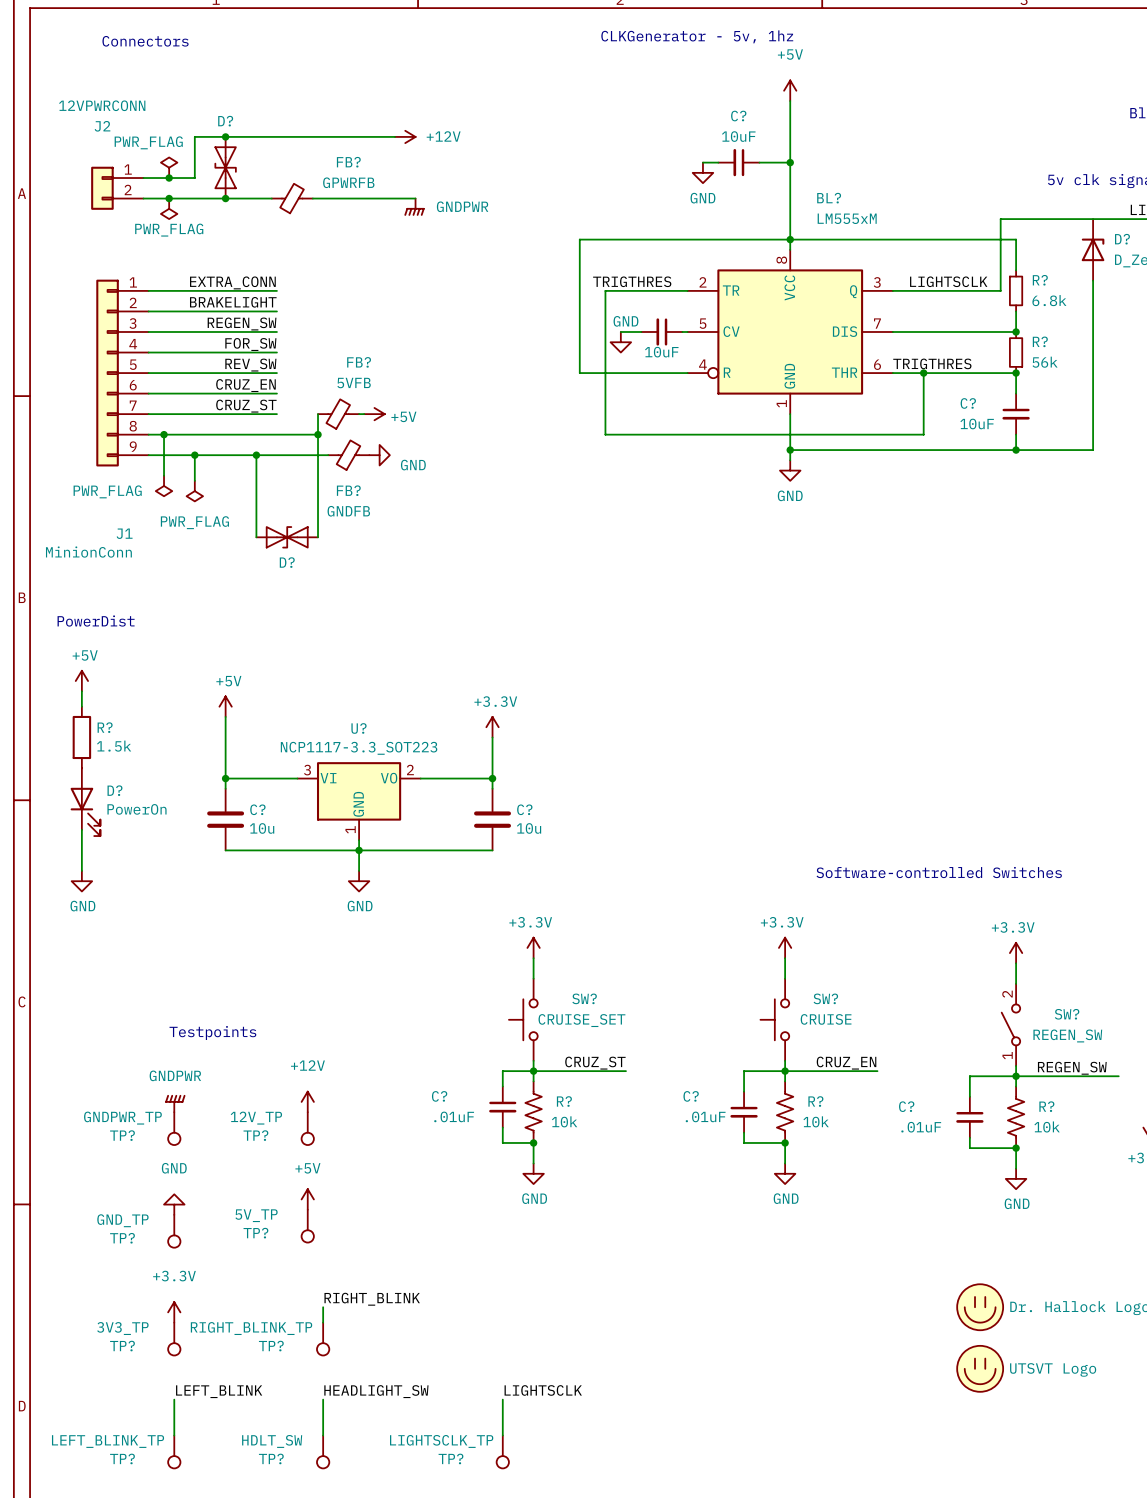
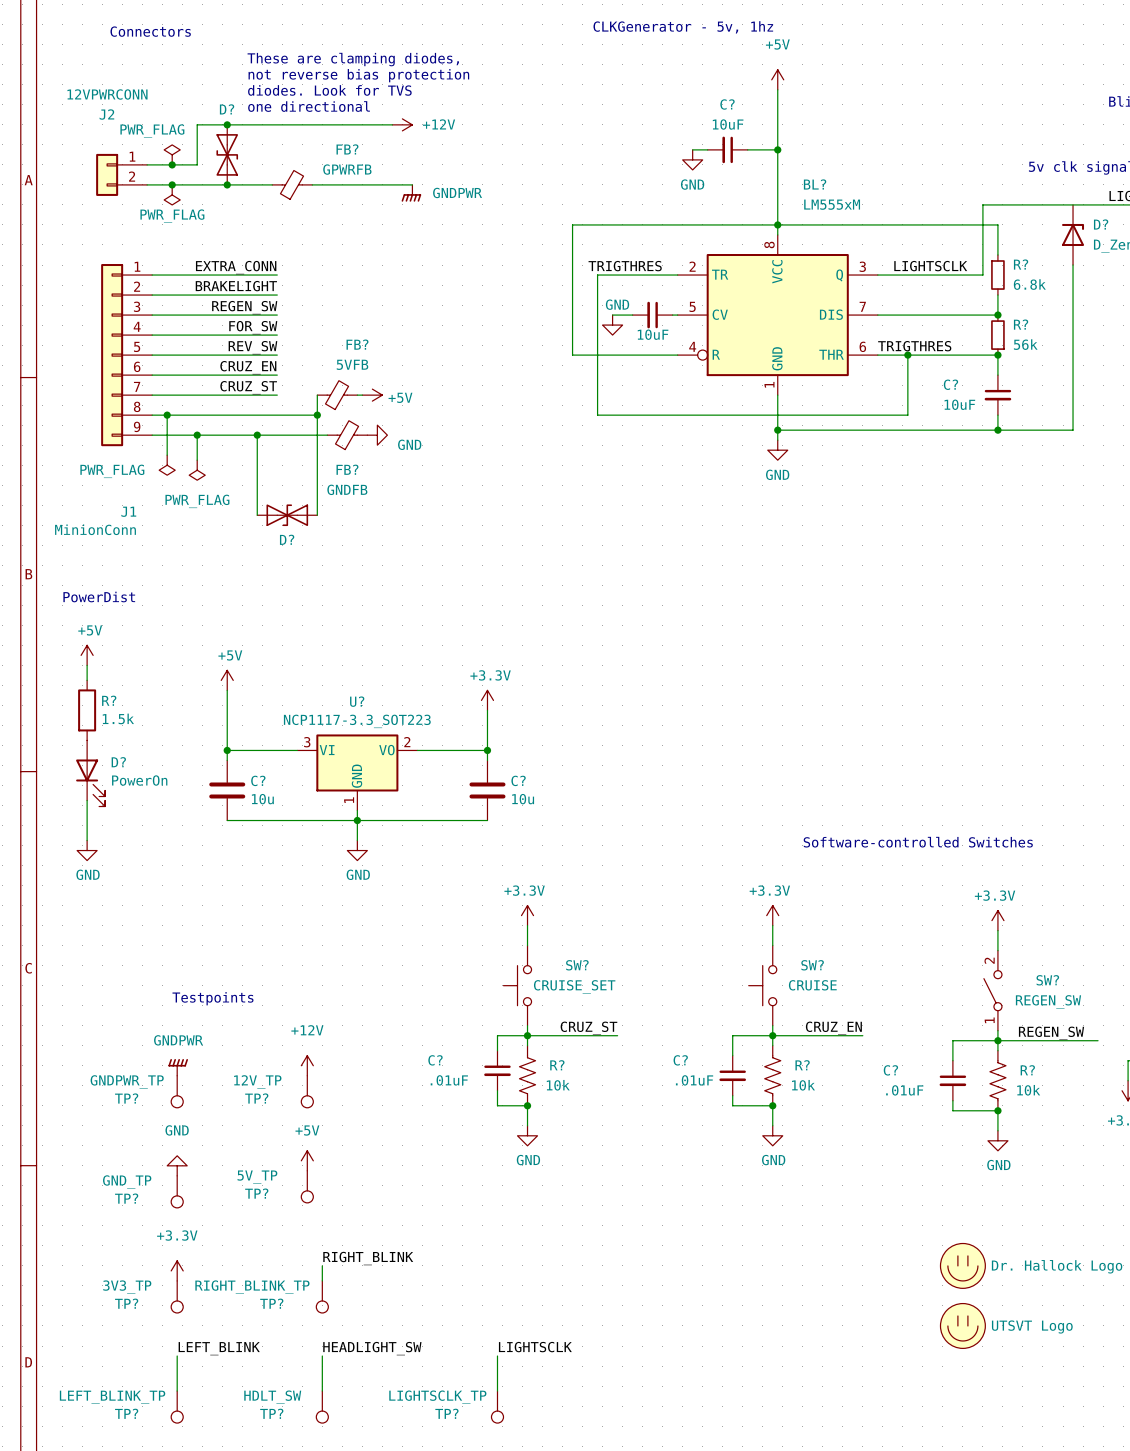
text: none -> These are clamping diodes, (353, 59)
text: none -> not reverse bias protection (358, 75)
text: none -> diodes. Look for TVS (329, 90)
text: none -> one directional (309, 106)

